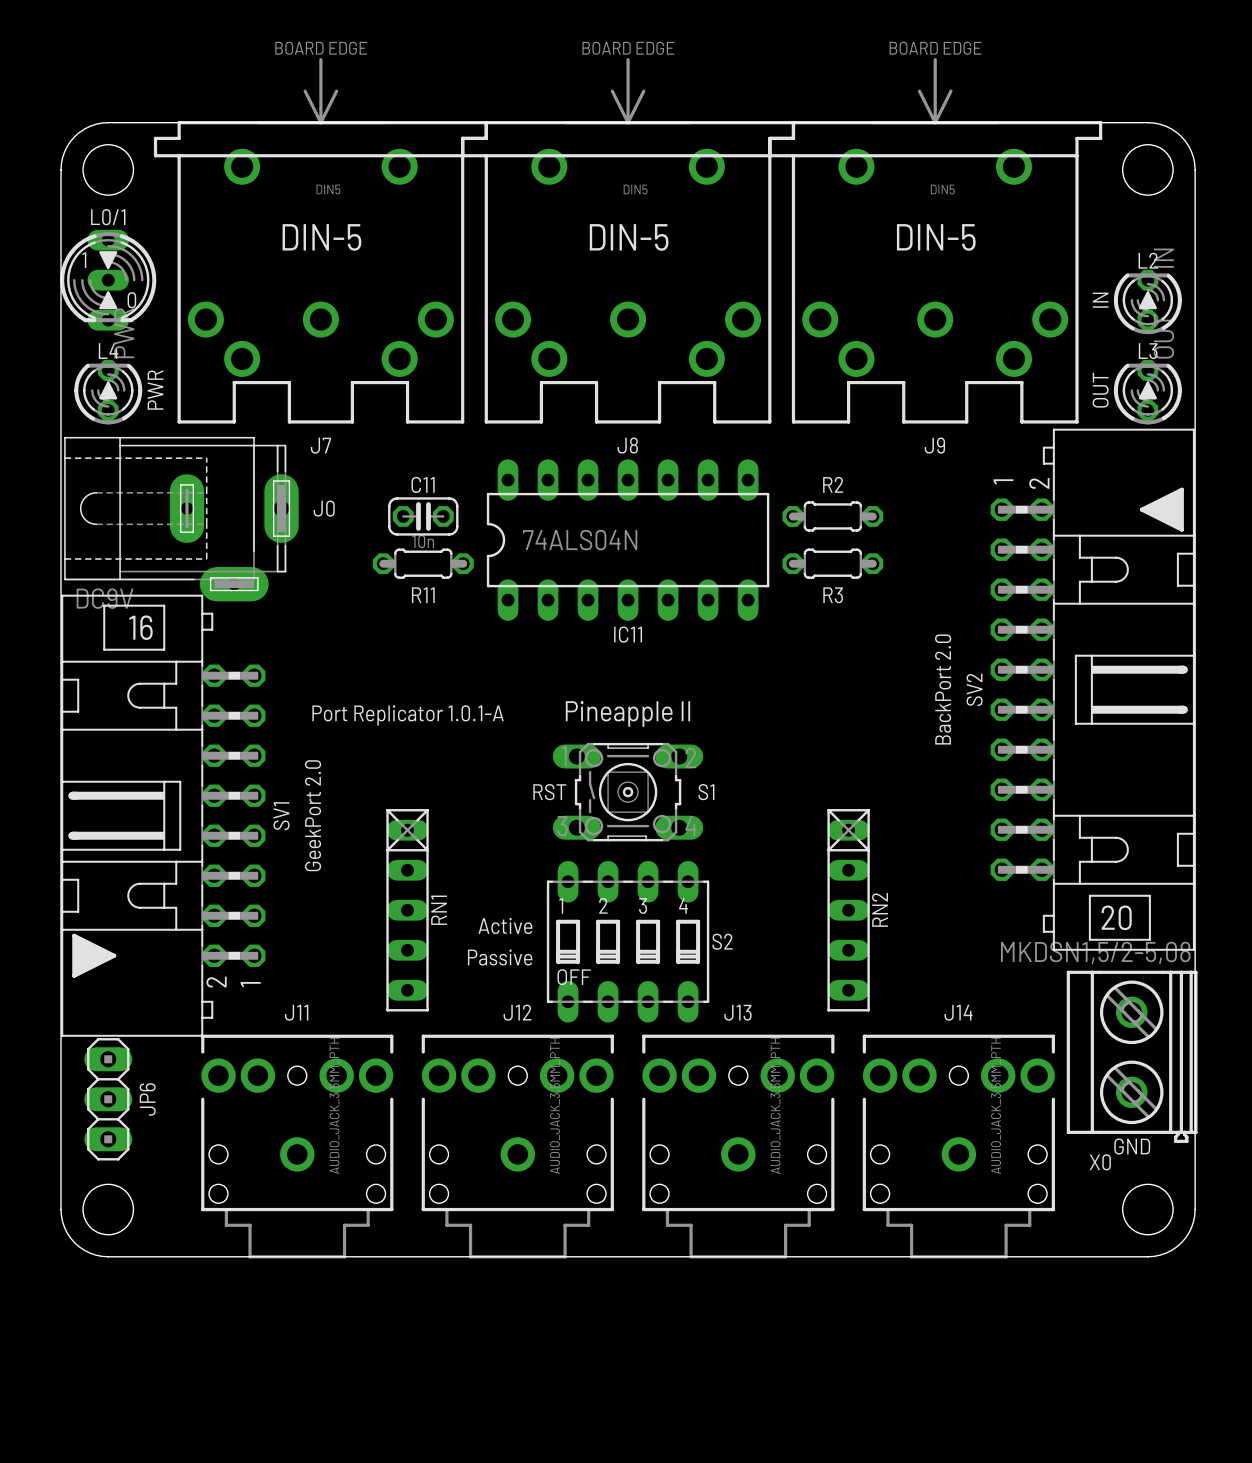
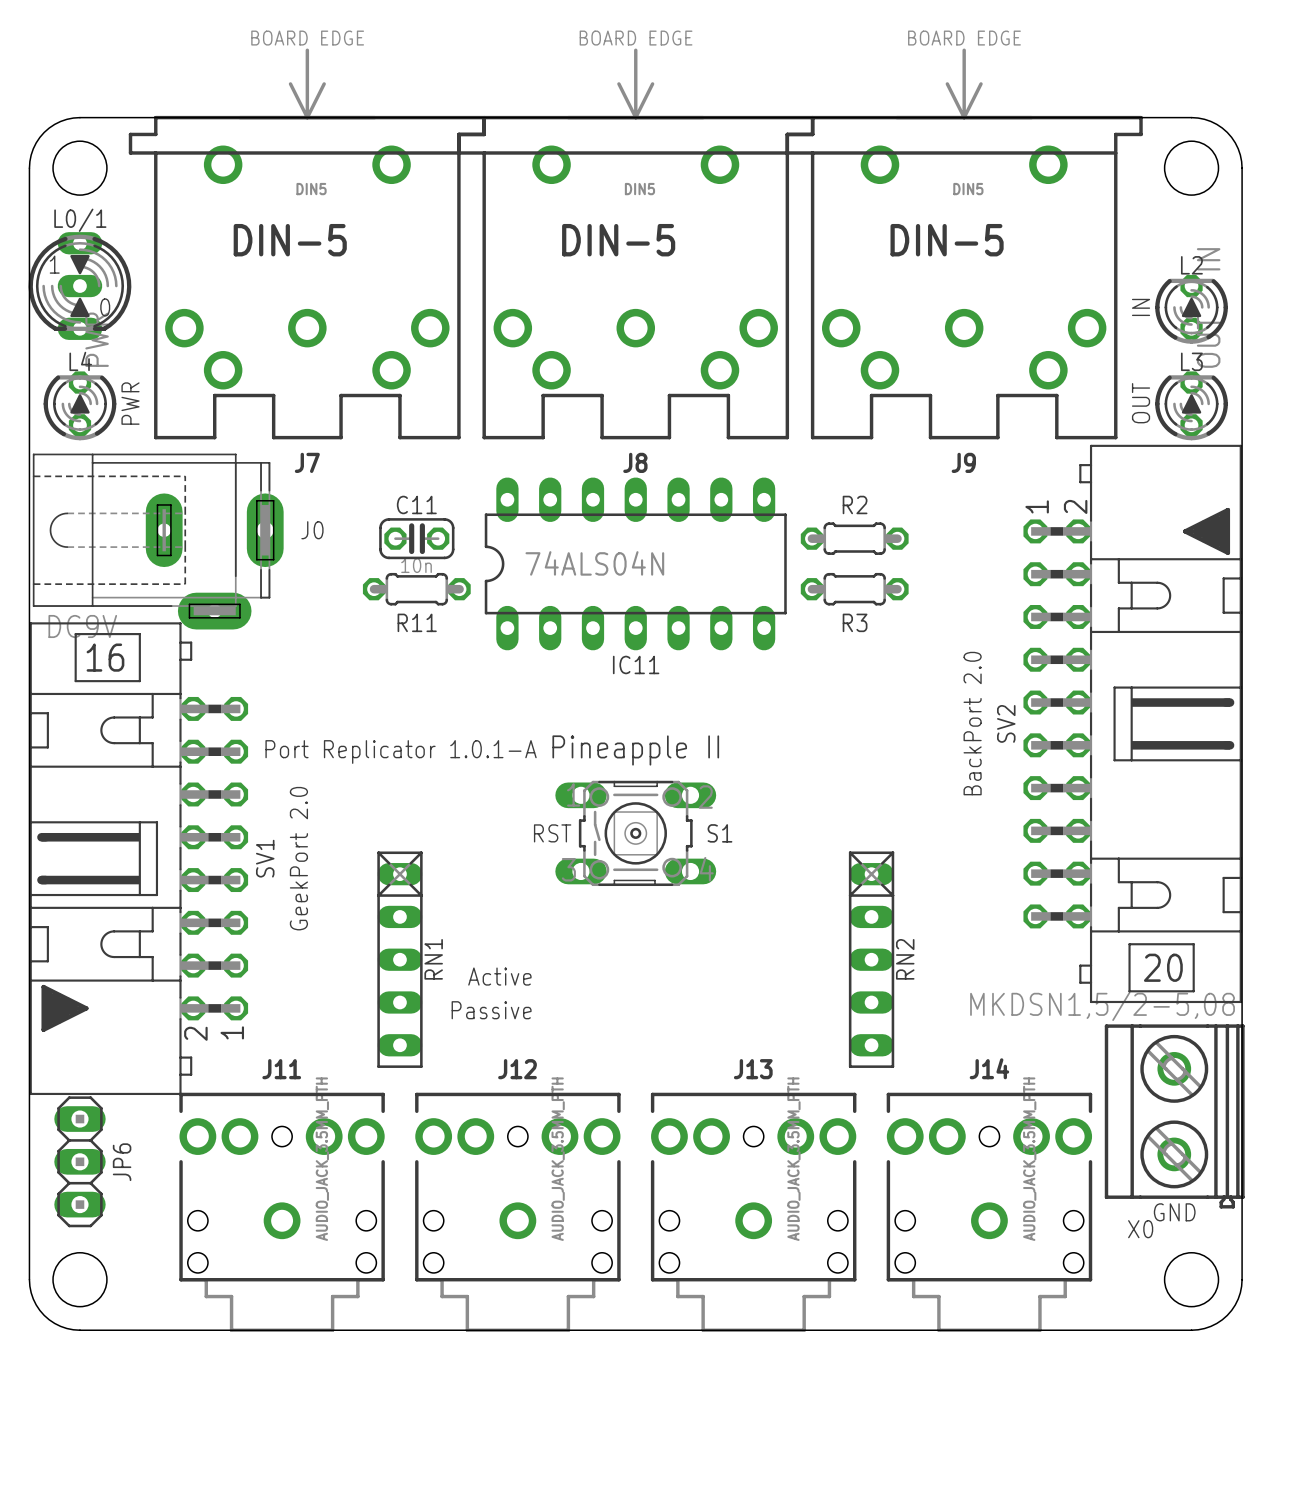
S2: (628, 941) -> none

